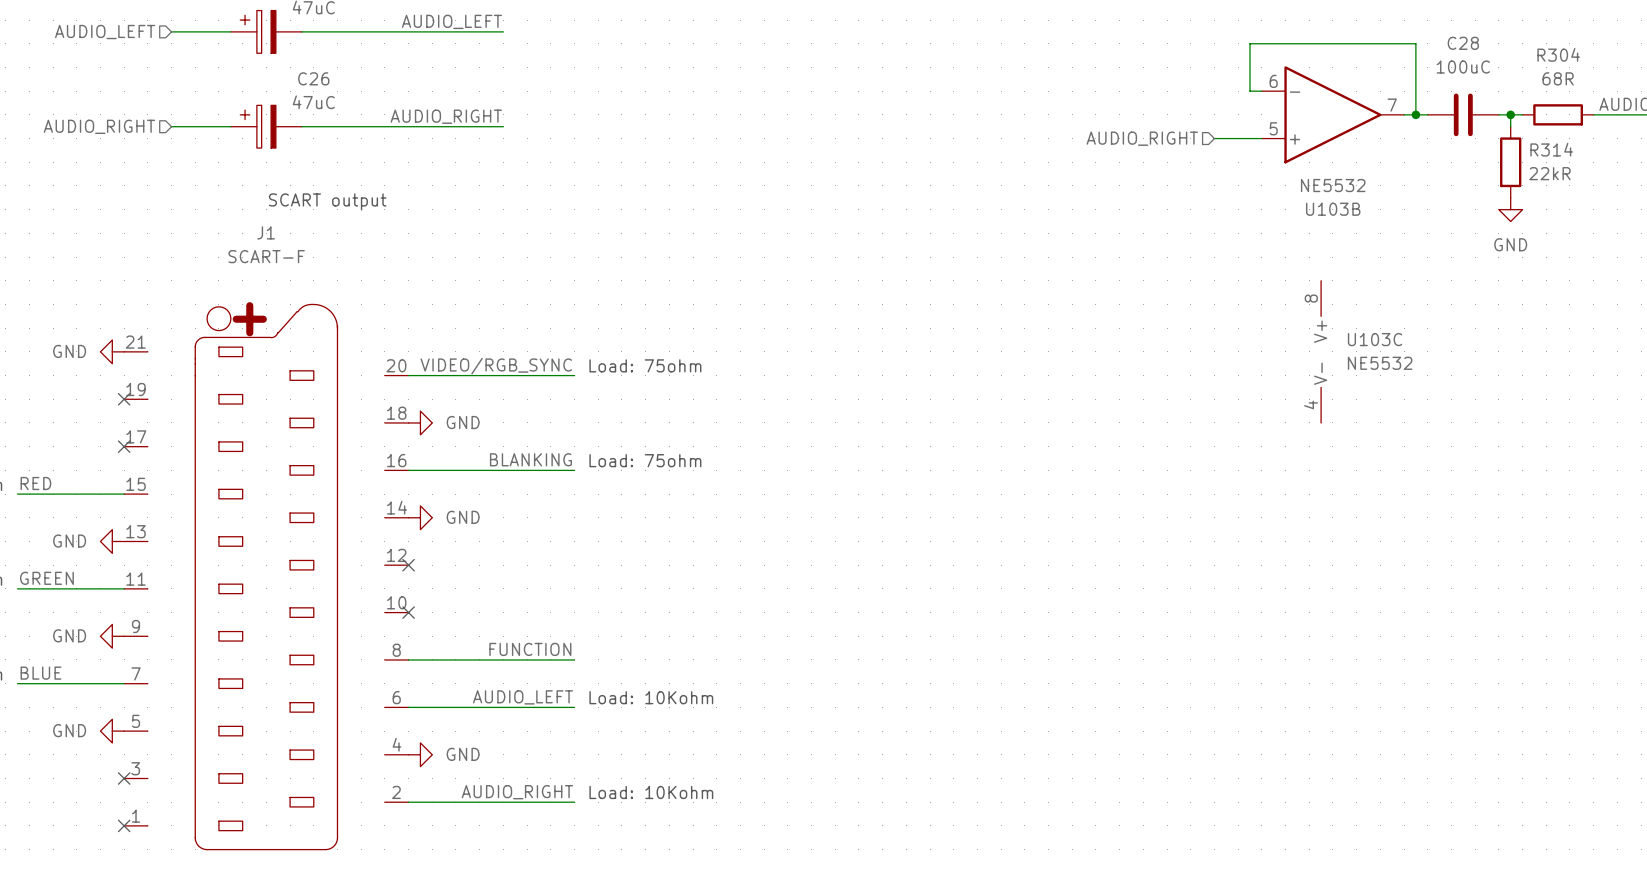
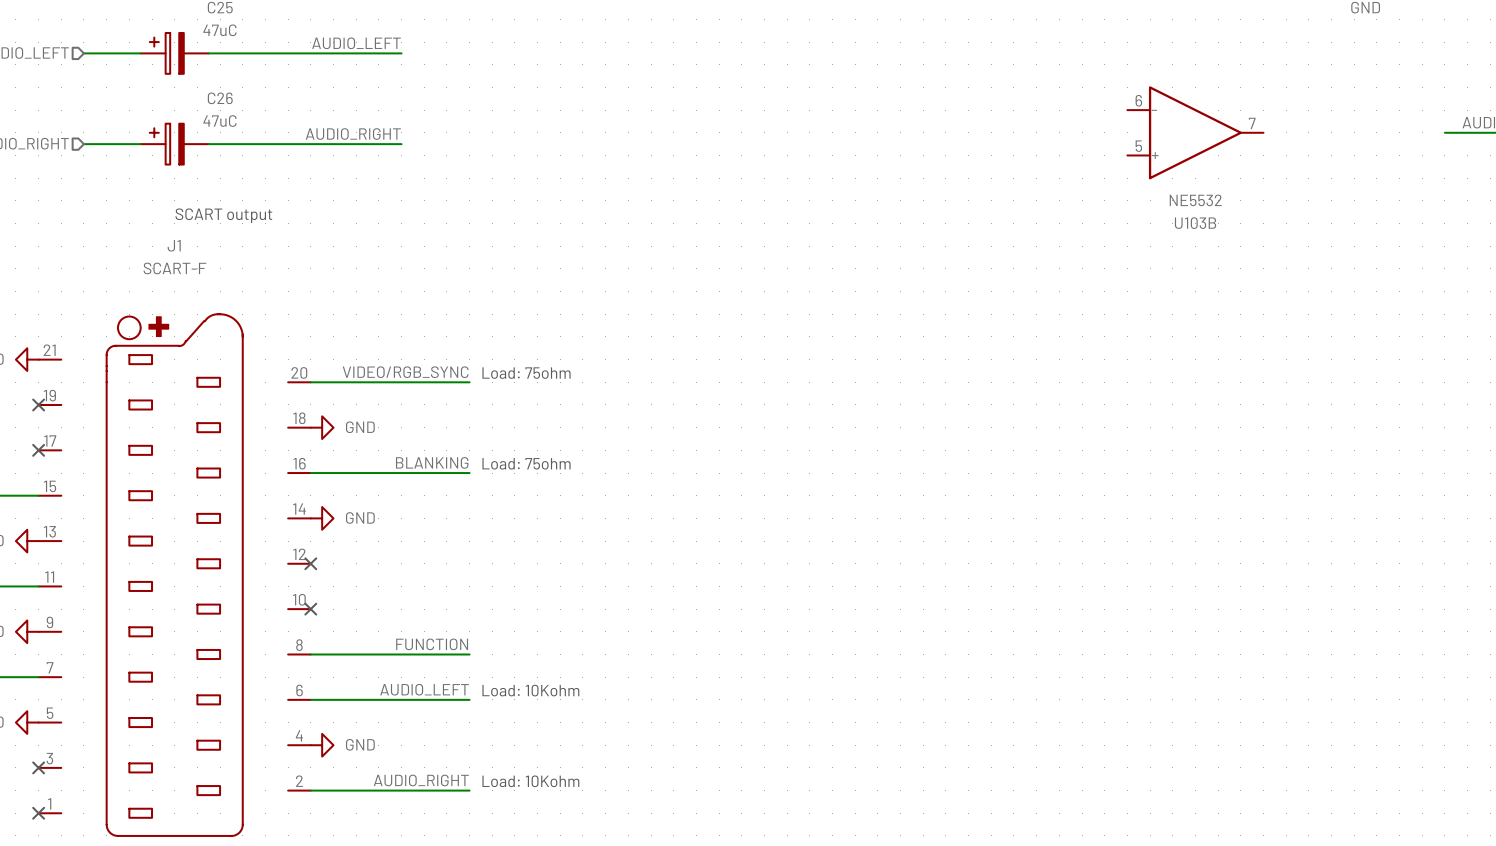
wire: (1261, 91) (1249, 91) (1249, 43) (1415, 43) (1415, 114) -> none
wire: (1404, 114) (1427, 114) -> none
junction: (1415, 114) -> none
C28: 100uC (1463, 114) -> none
wire: (1498, 114) (1522, 114) -> none
wire: (1510, 114) (1510, 126) -> none
junction: (1510, 114) -> none
R304: 68R (1558, 114) -> none
hierarchical label: AUDIO_RIGHT (1142, 138) -> none
wire: (1214, 138) (1261, 138) -> none
R314: 22kR (1510, 162) -> none
power symbol: GND (1510, 209) -> none
U103C: NE5532 (1321, 351) -> none

